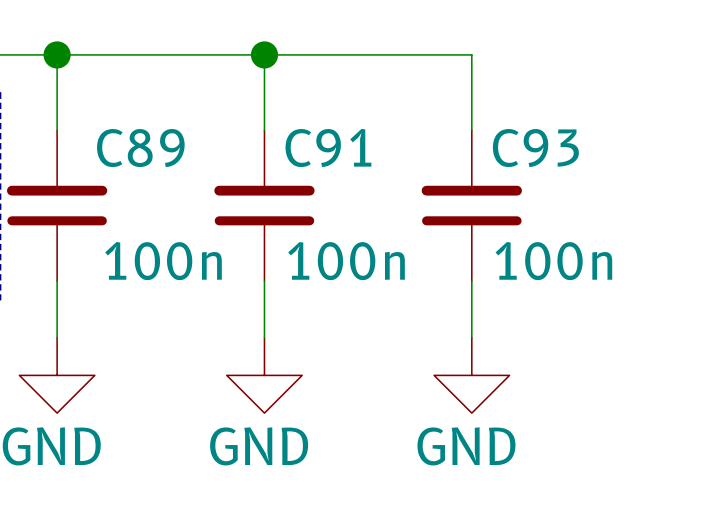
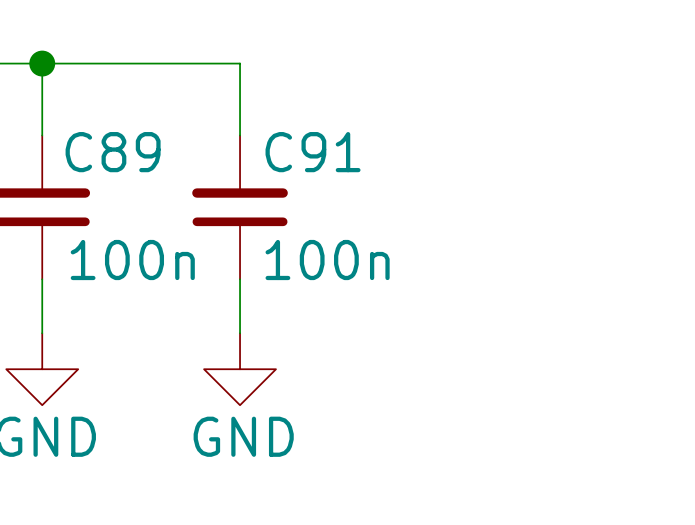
wire: (264, 54) (471, 54) (471, 130) -> none
junction: (264, 54) -> none
C93: (471, 205) -> none
wire: (471, 281) (471, 337) -> none
power symbol: GND (471, 375) -> none

